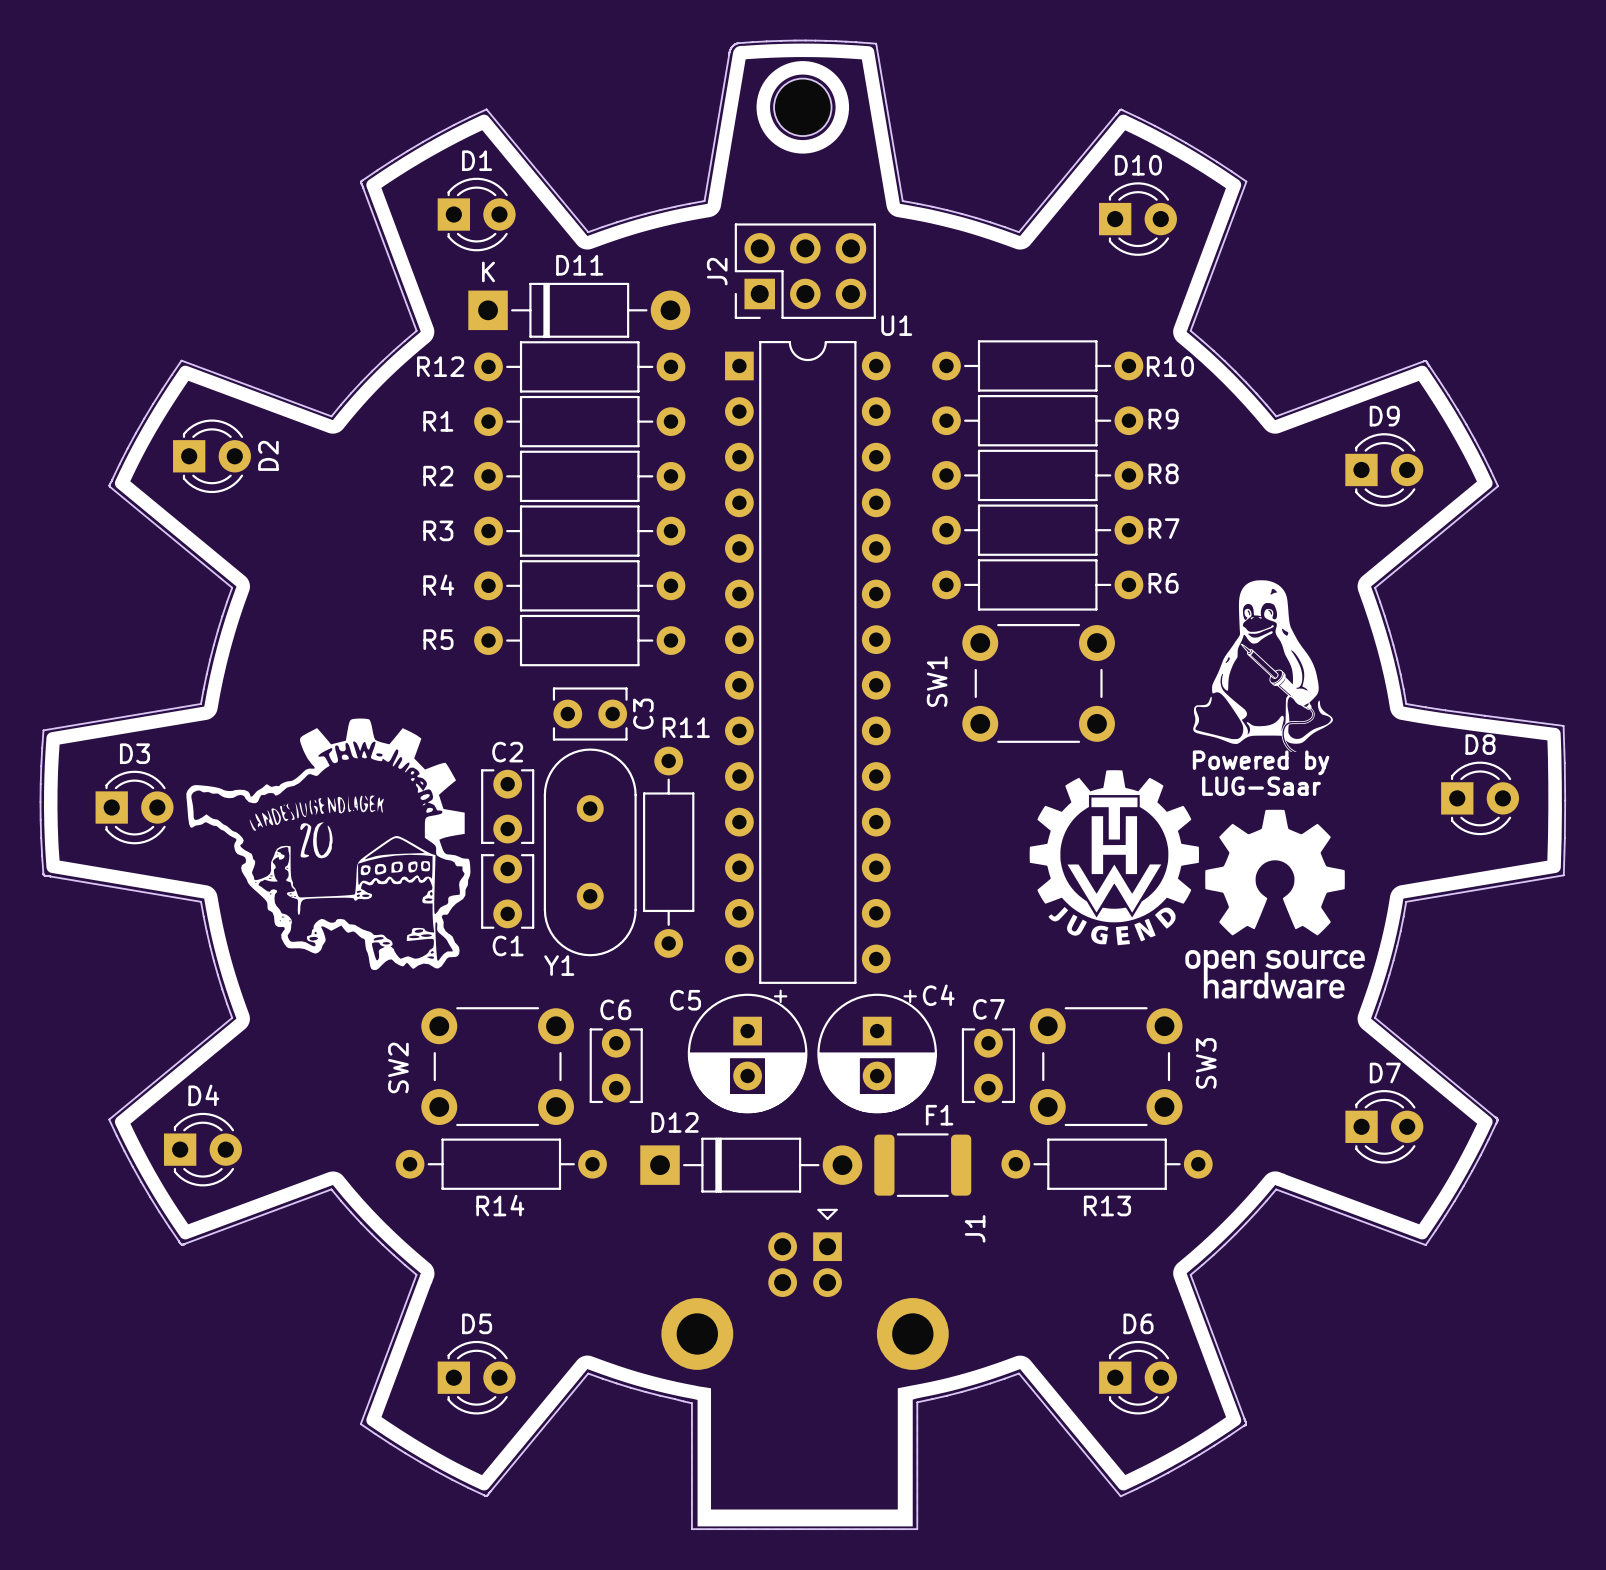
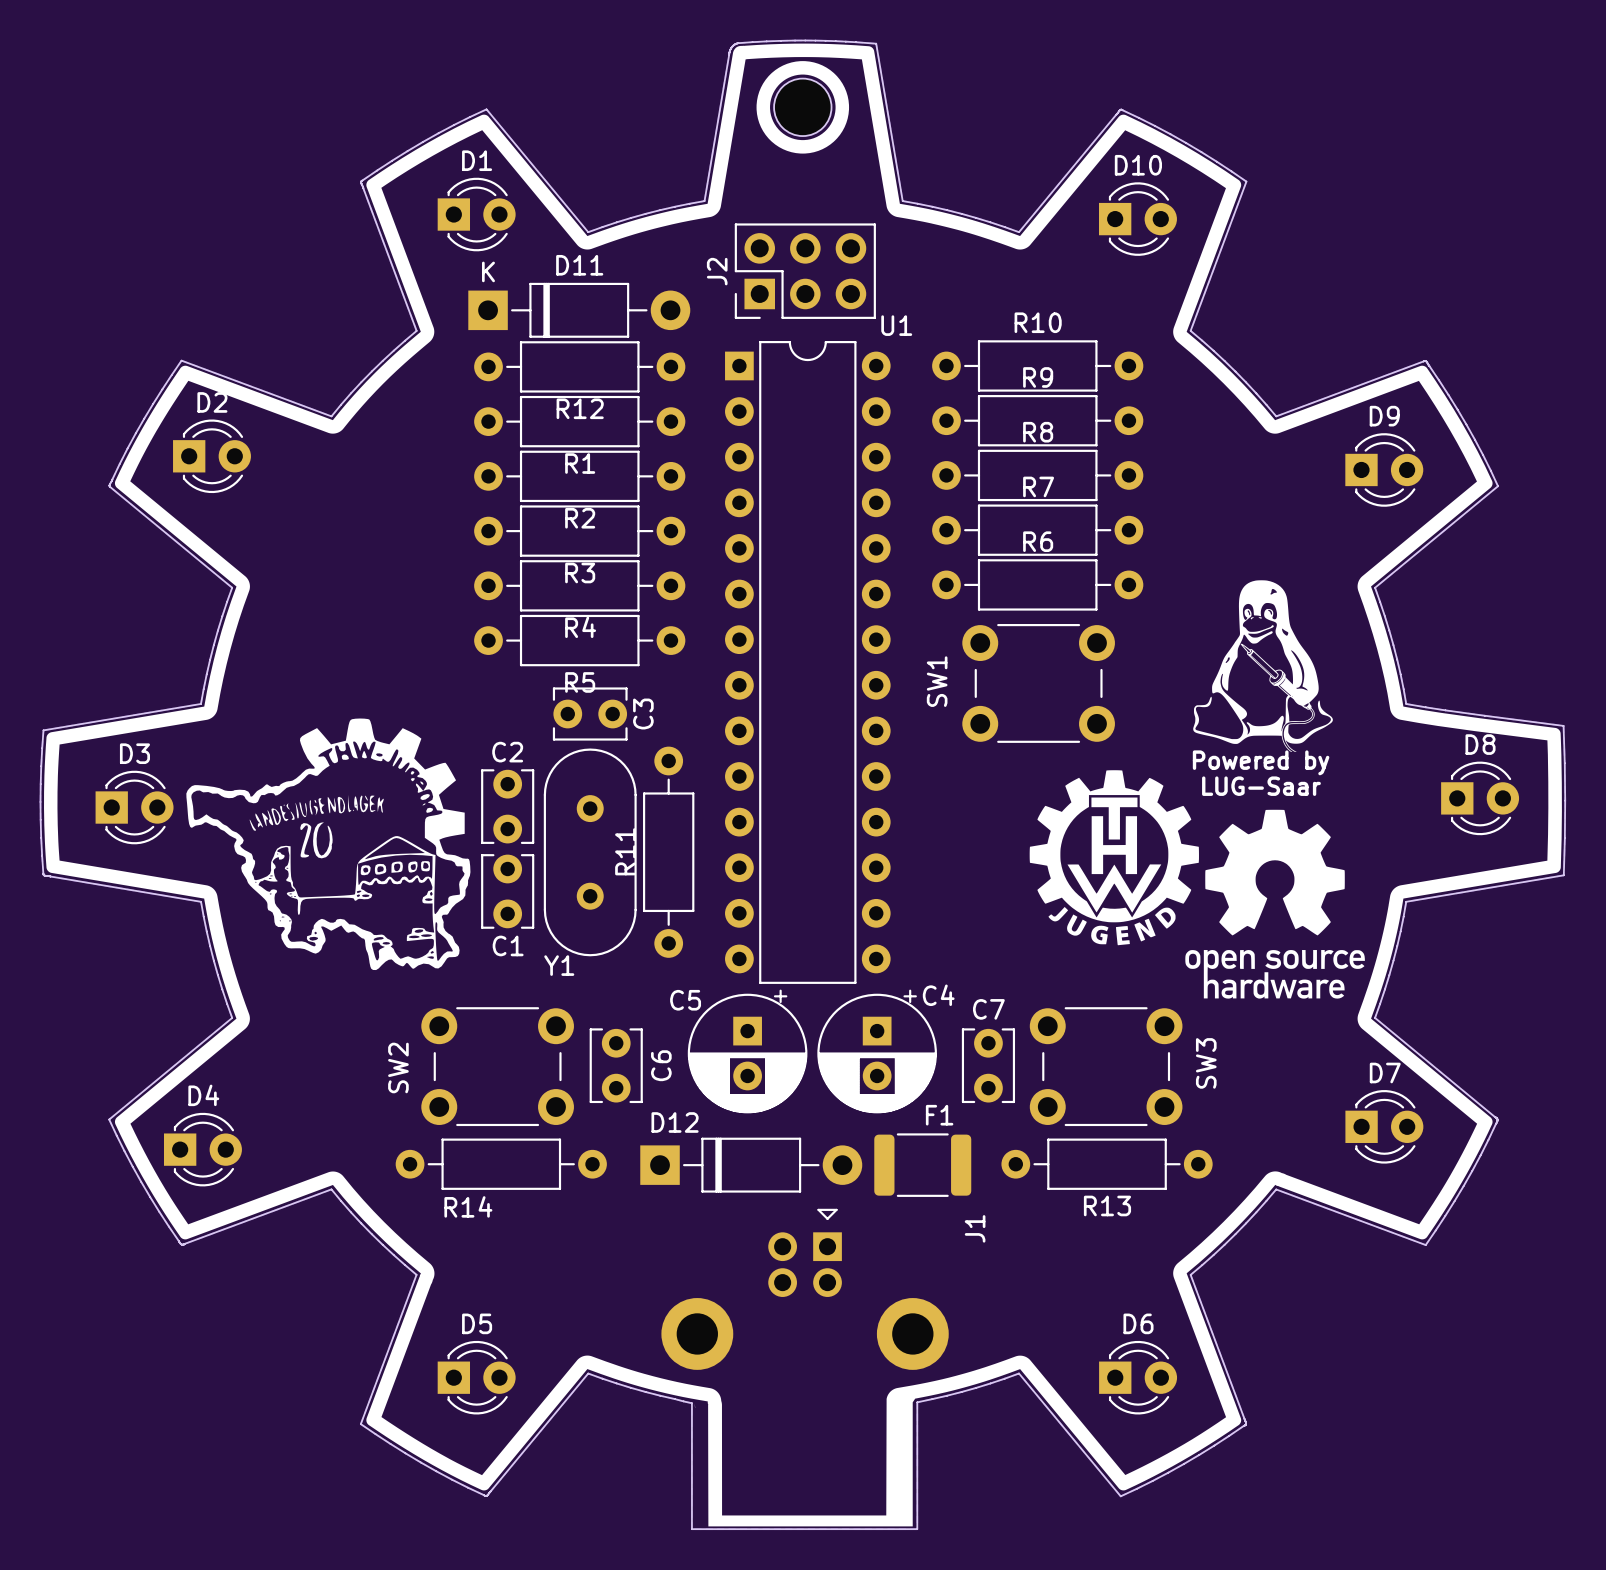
drawing shape: [44, 43, 1562, 1527] -> [44, 43, 1562, 1527]
R12 name position: R12 (440, 366) -> R12 (580, 408)
R10 name position: R10 (1170, 366) -> R10 (1038, 322)
R9 name position: R9 (1163, 419) -> R9 (1038, 377)
R1 name position: R1 (438, 421) -> R1 (580, 463)
D2 name rotation: 0° (268, 455) -> 90° clockwise (212, 402)
D2 name position: D2 (268, 455) -> D2 (212, 402)
R8 name position: R8 (1163, 473) -> R8 (1038, 432)
R2 name position: R2 (438, 476) -> R2 (580, 518)
R7 name position: R7 (1164, 528) -> R7 (1038, 486)
R3 name position: R3 (438, 530) -> R3 (580, 572)
R6 name position: R6 (1163, 583) -> R6 (1038, 541)
R4 name position: R4 (438, 585) -> R4 (580, 627)
R5 name position: R5 (438, 639) -> R5 (580, 682)
R11 name rotation: 0° (686, 727) -> 90° counterclockwise (625, 851)
R11 name position: R11 (686, 727) -> R11 (625, 851)
C6 name rotation: 0° (615, 1009) -> 90° counterclockwise (661, 1065)
C6 name position: C6 (615, 1009) -> C6 (661, 1065)
R14 name position: R14 (500, 1205) -> R14 (468, 1206)

